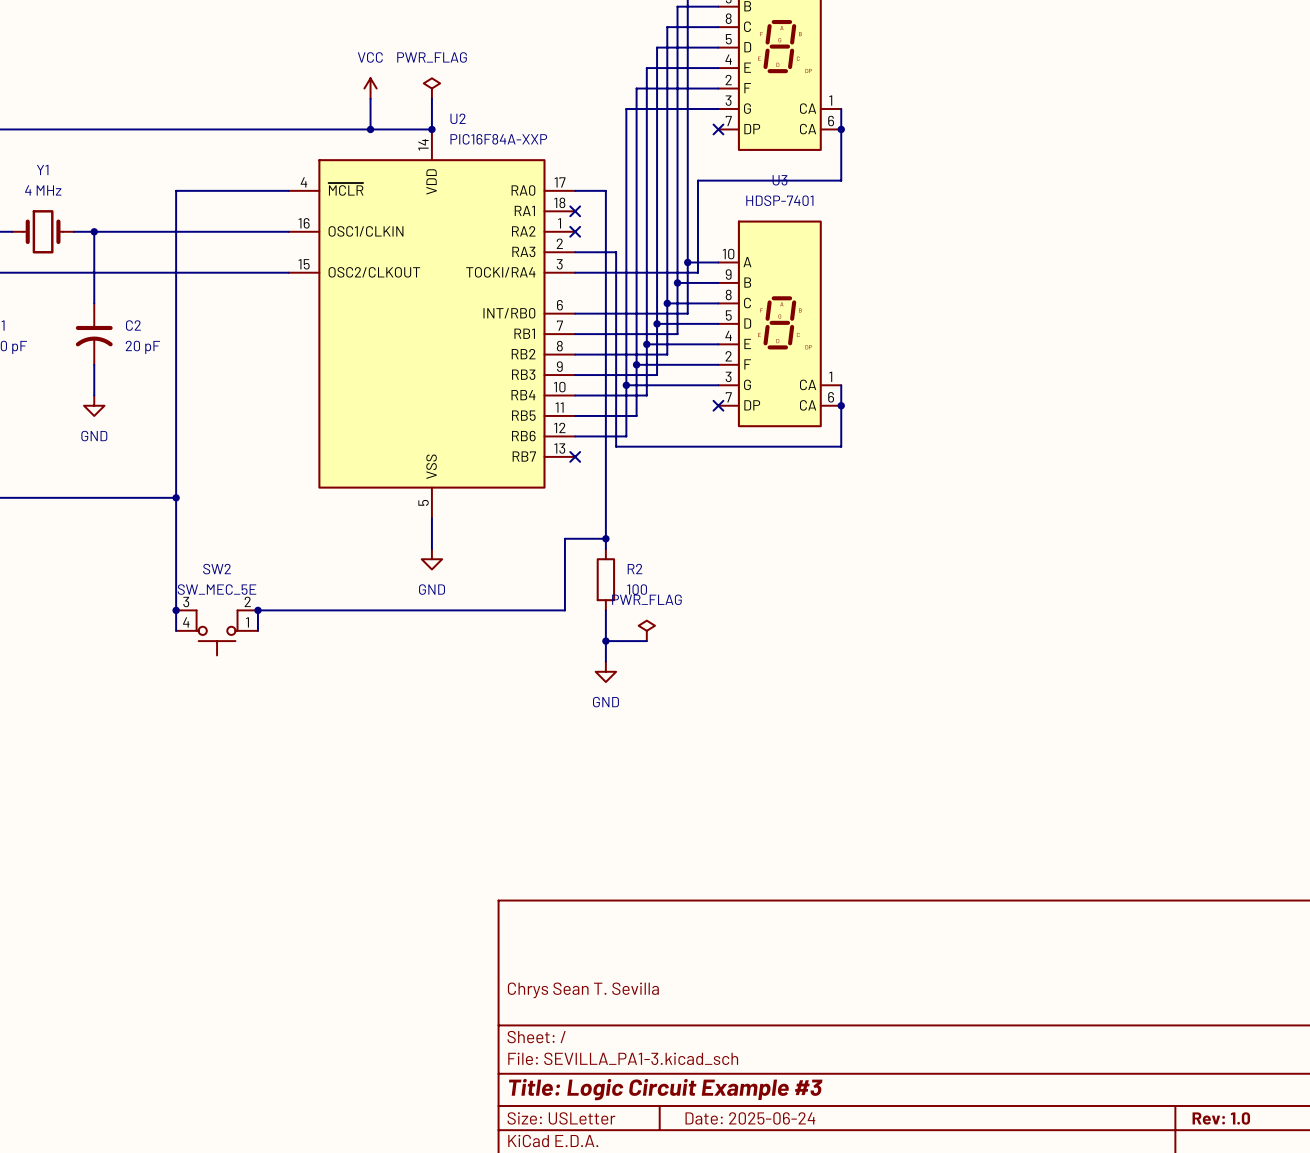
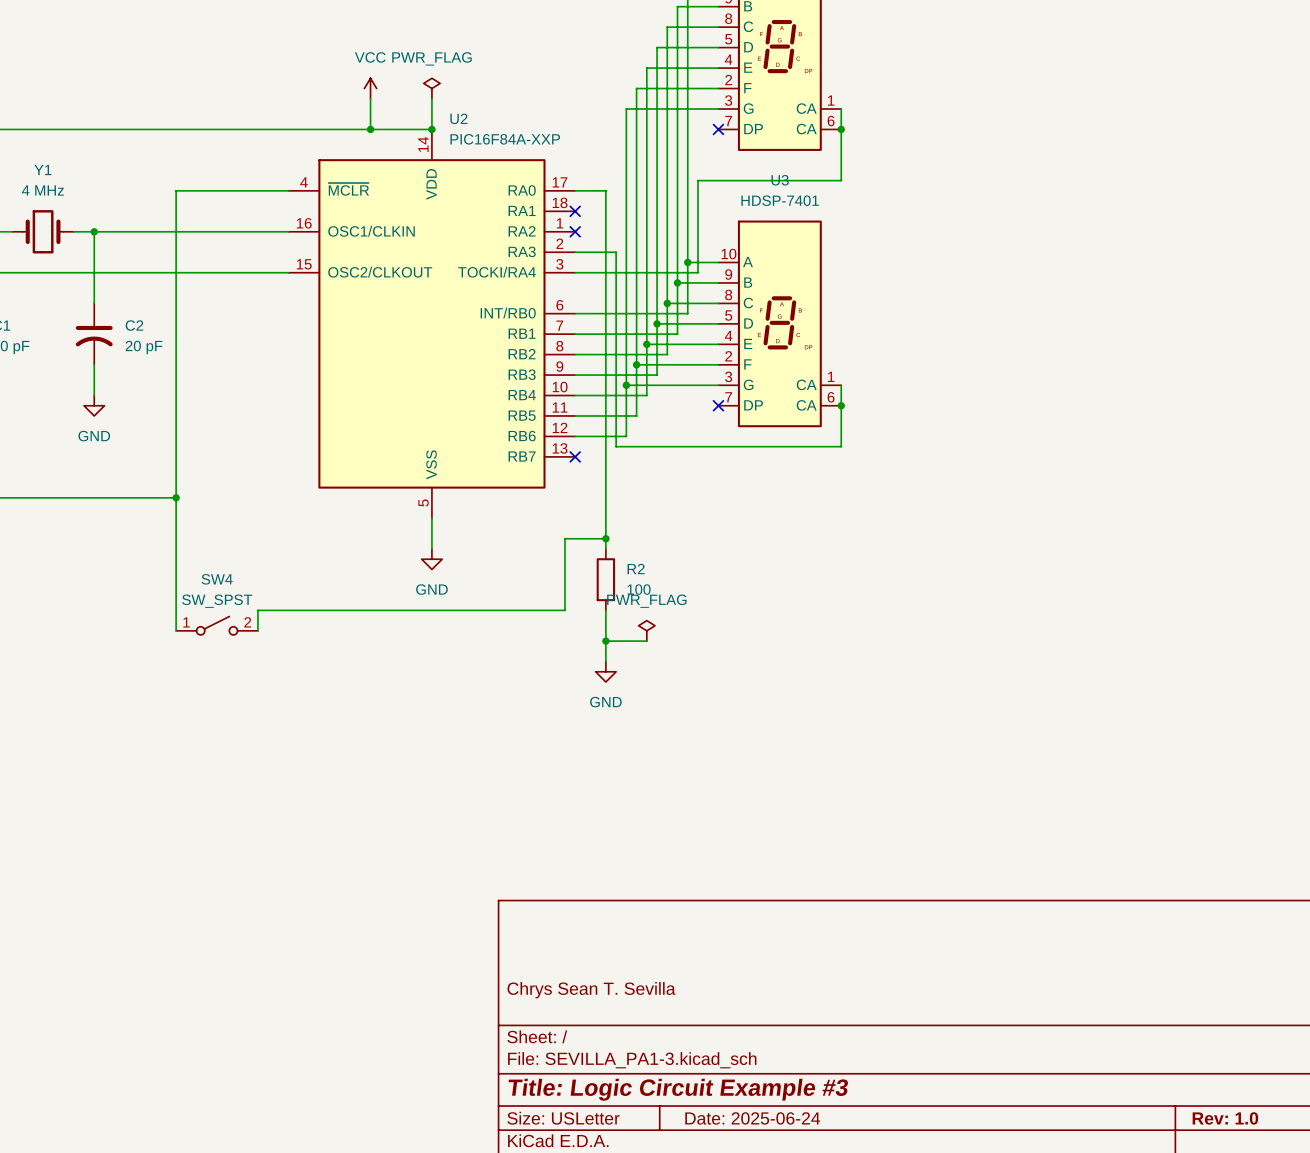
junction: (176, 610) -> none
junction: (257, 610) -> none
SW4: none -> SW_SPST (217, 625)
SW2: SW_MEC_5E (217, 632) -> none

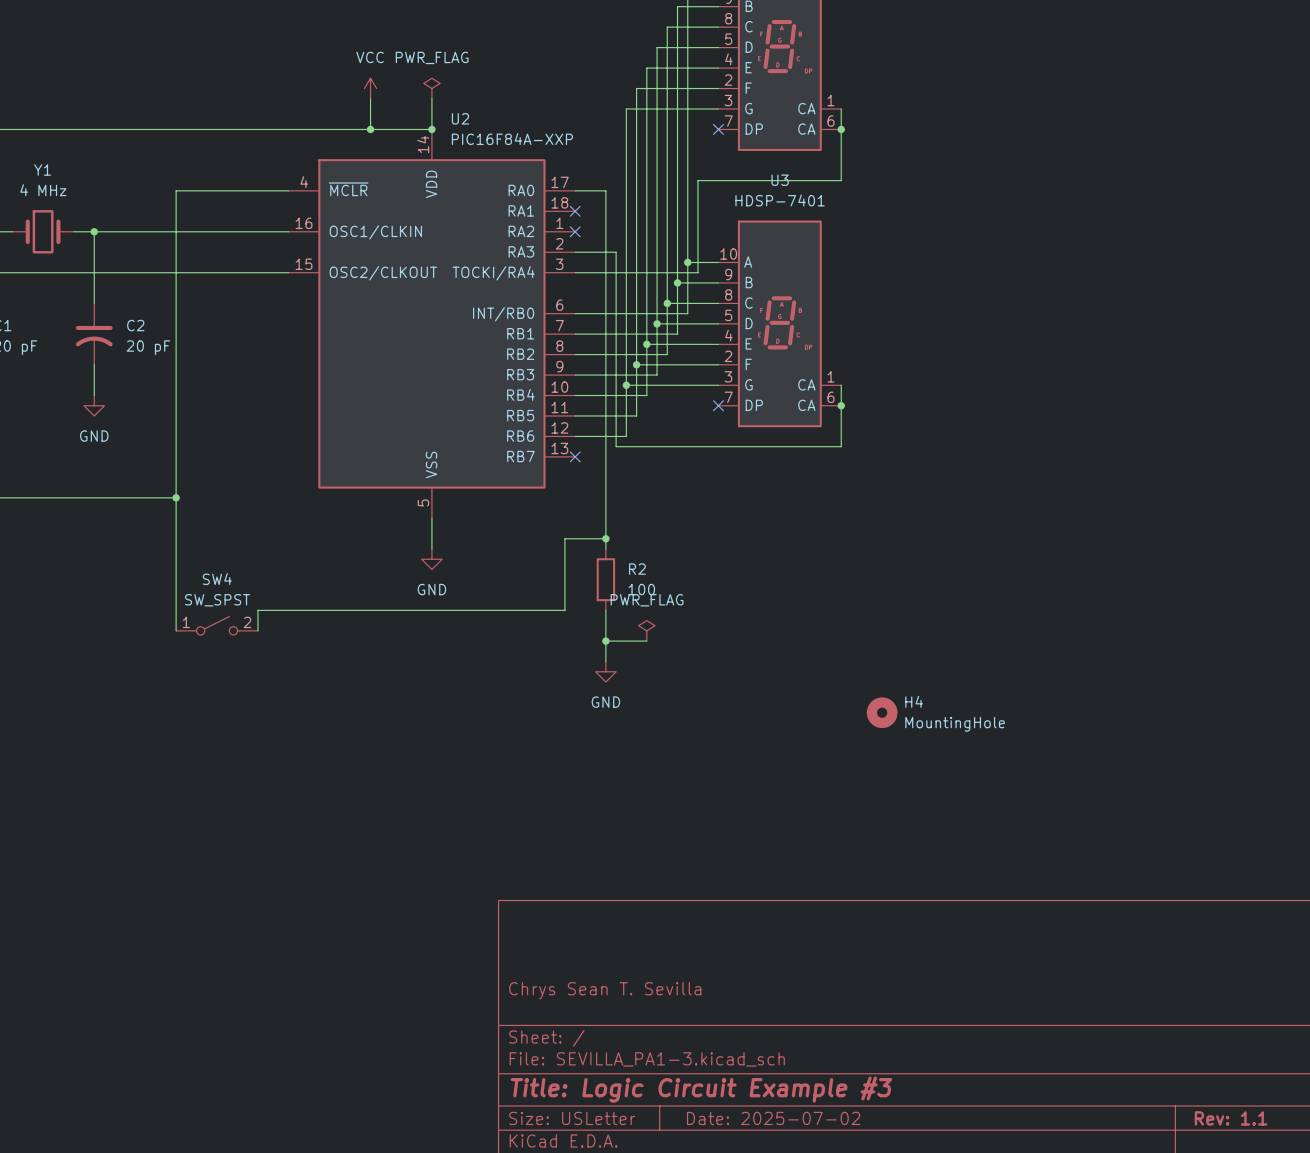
H4: none -> MountingHole (882, 712)
title block: Date: 2025-06-24 (752, 1118) -> Date: 2025-07-02 (773, 1118)
title block: Rev: 1.0 (1225, 1118) -> Rev: 1.1 (1231, 1118)

